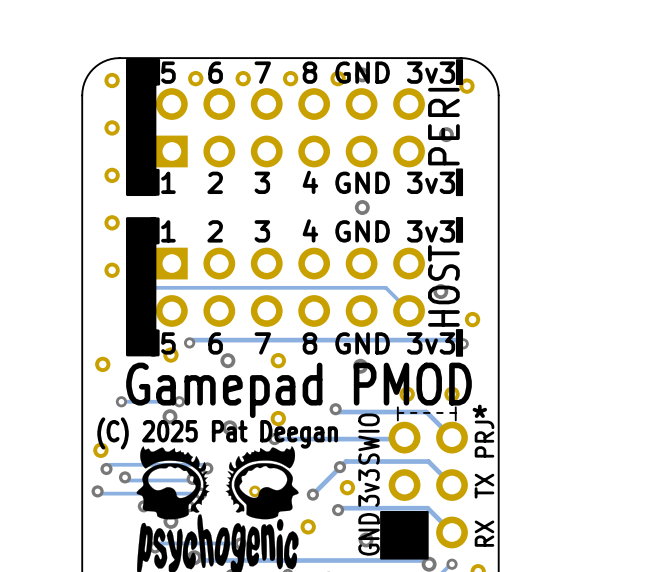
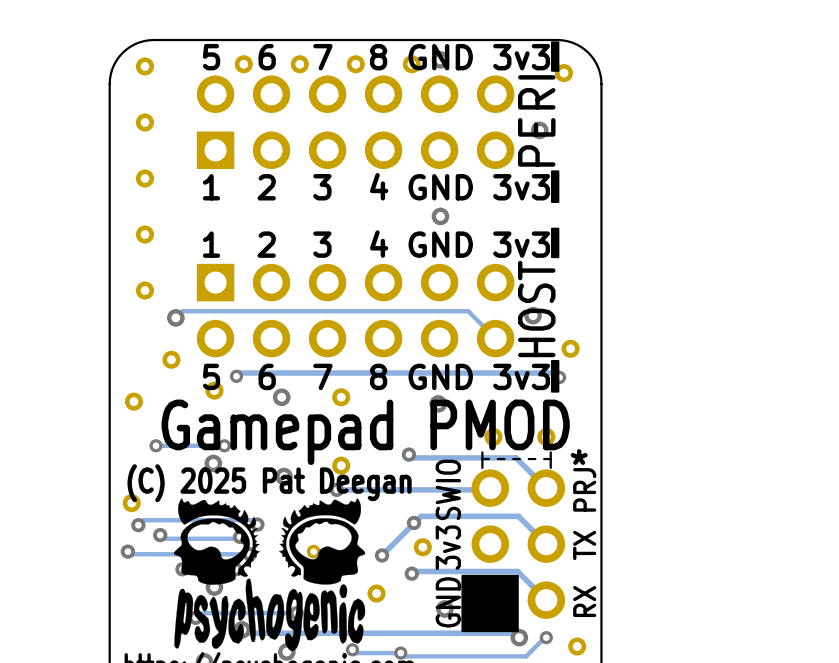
drawing: [125, 58, 161, 357] -> none

